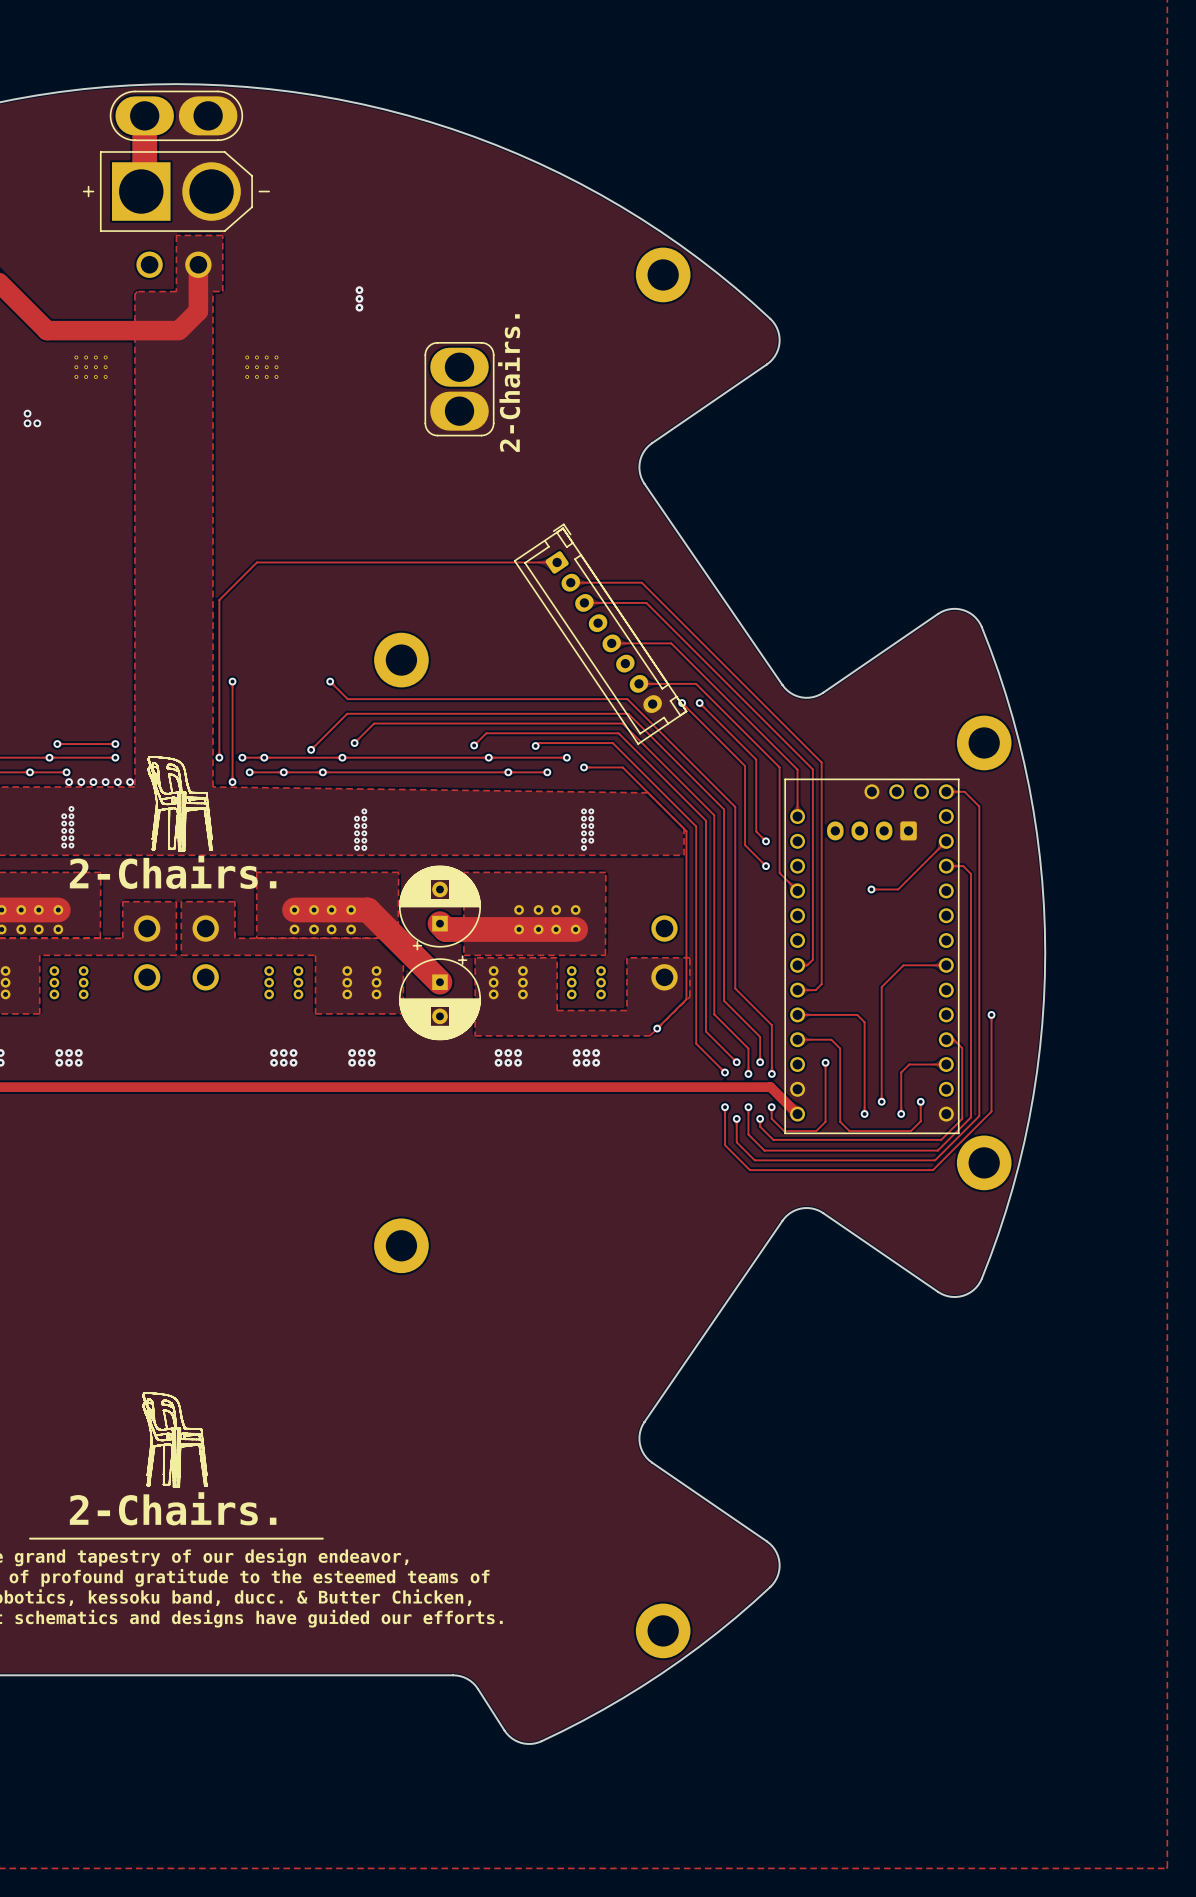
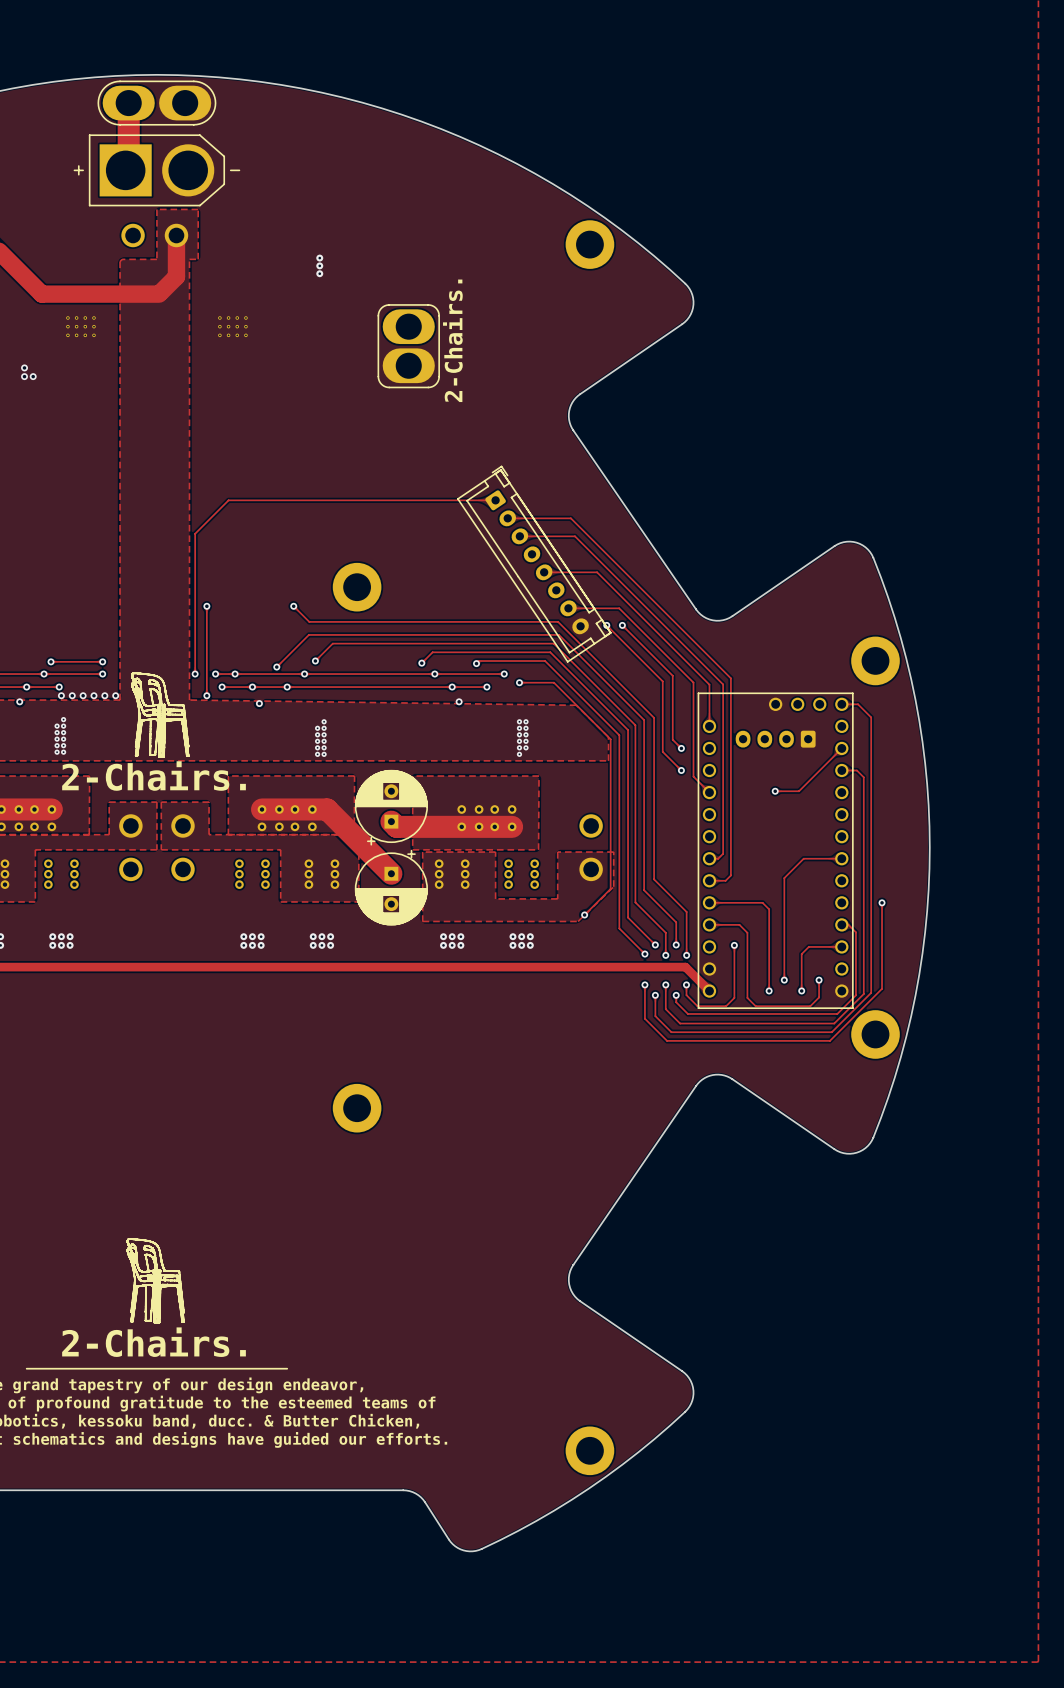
via: none -> (19, 701)
via: none -> (459, 701)
via: none -> (259, 703)

